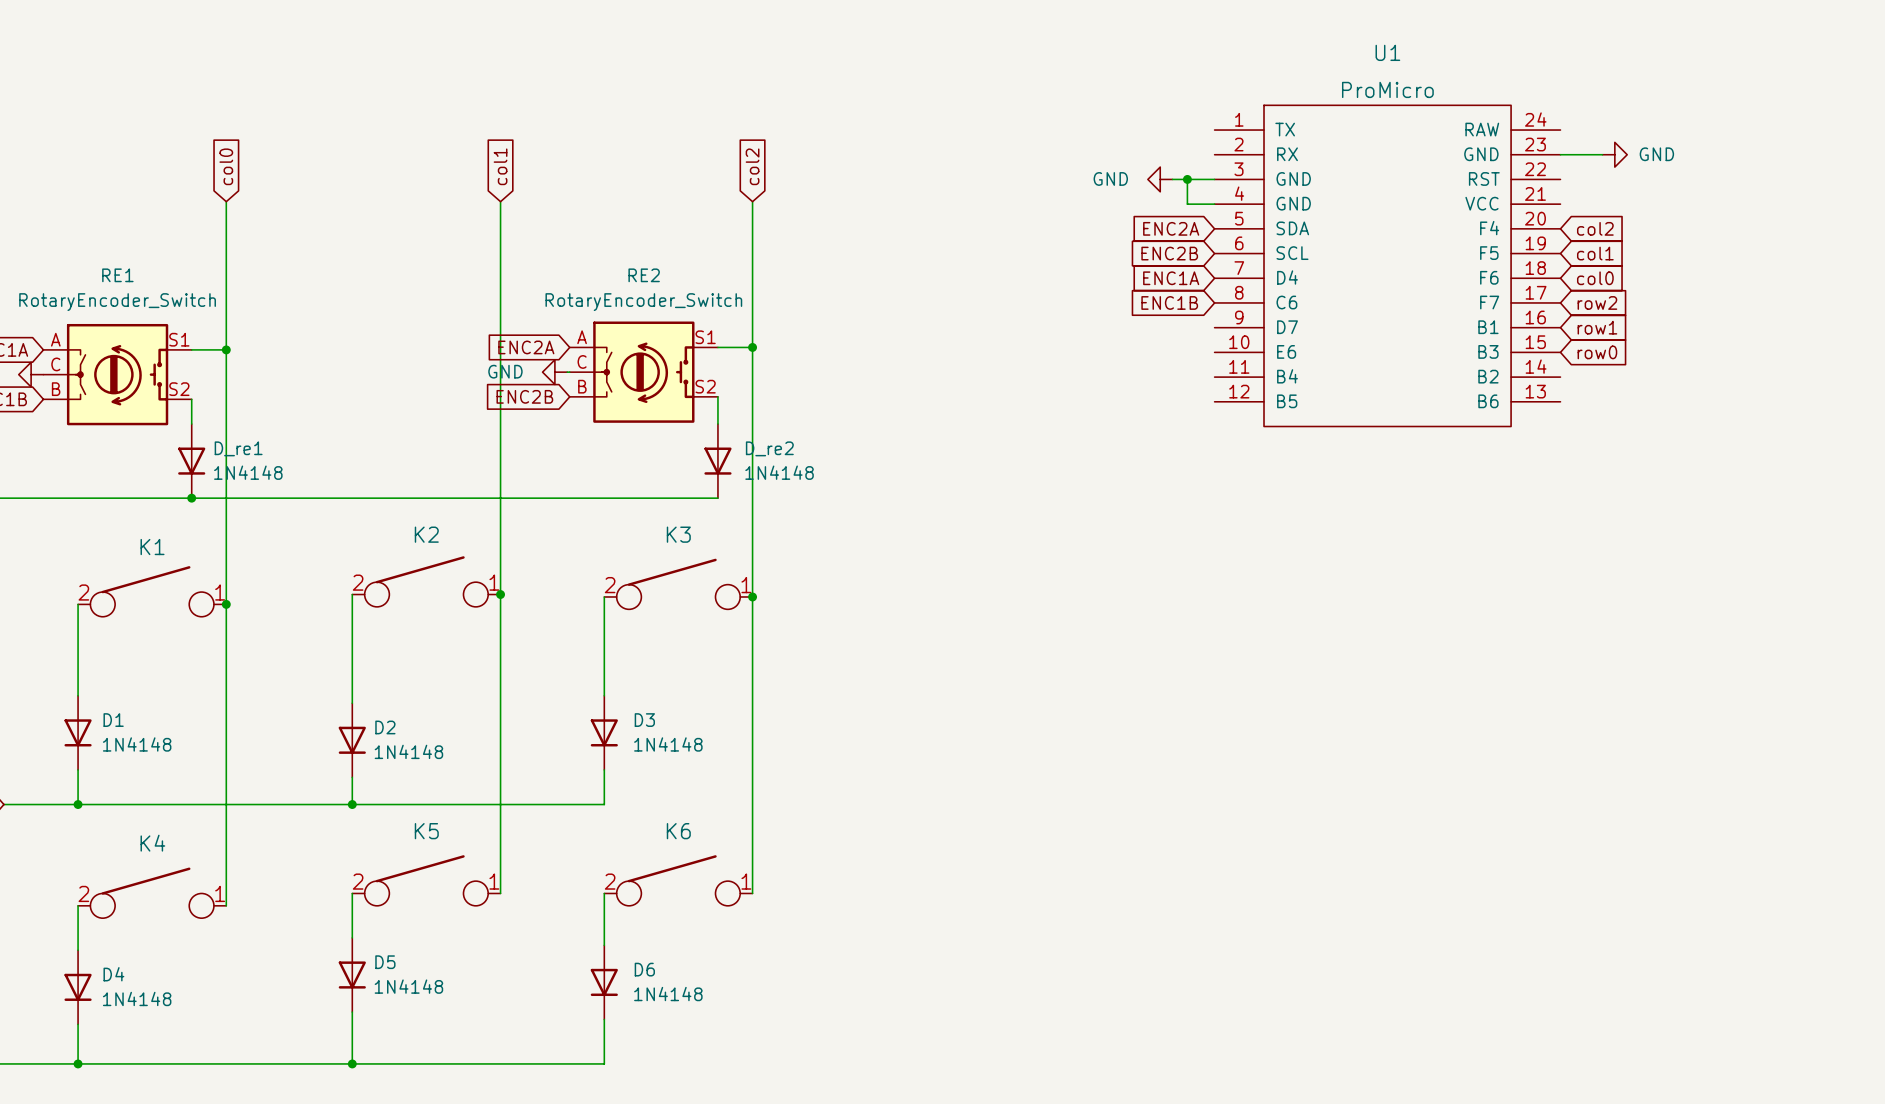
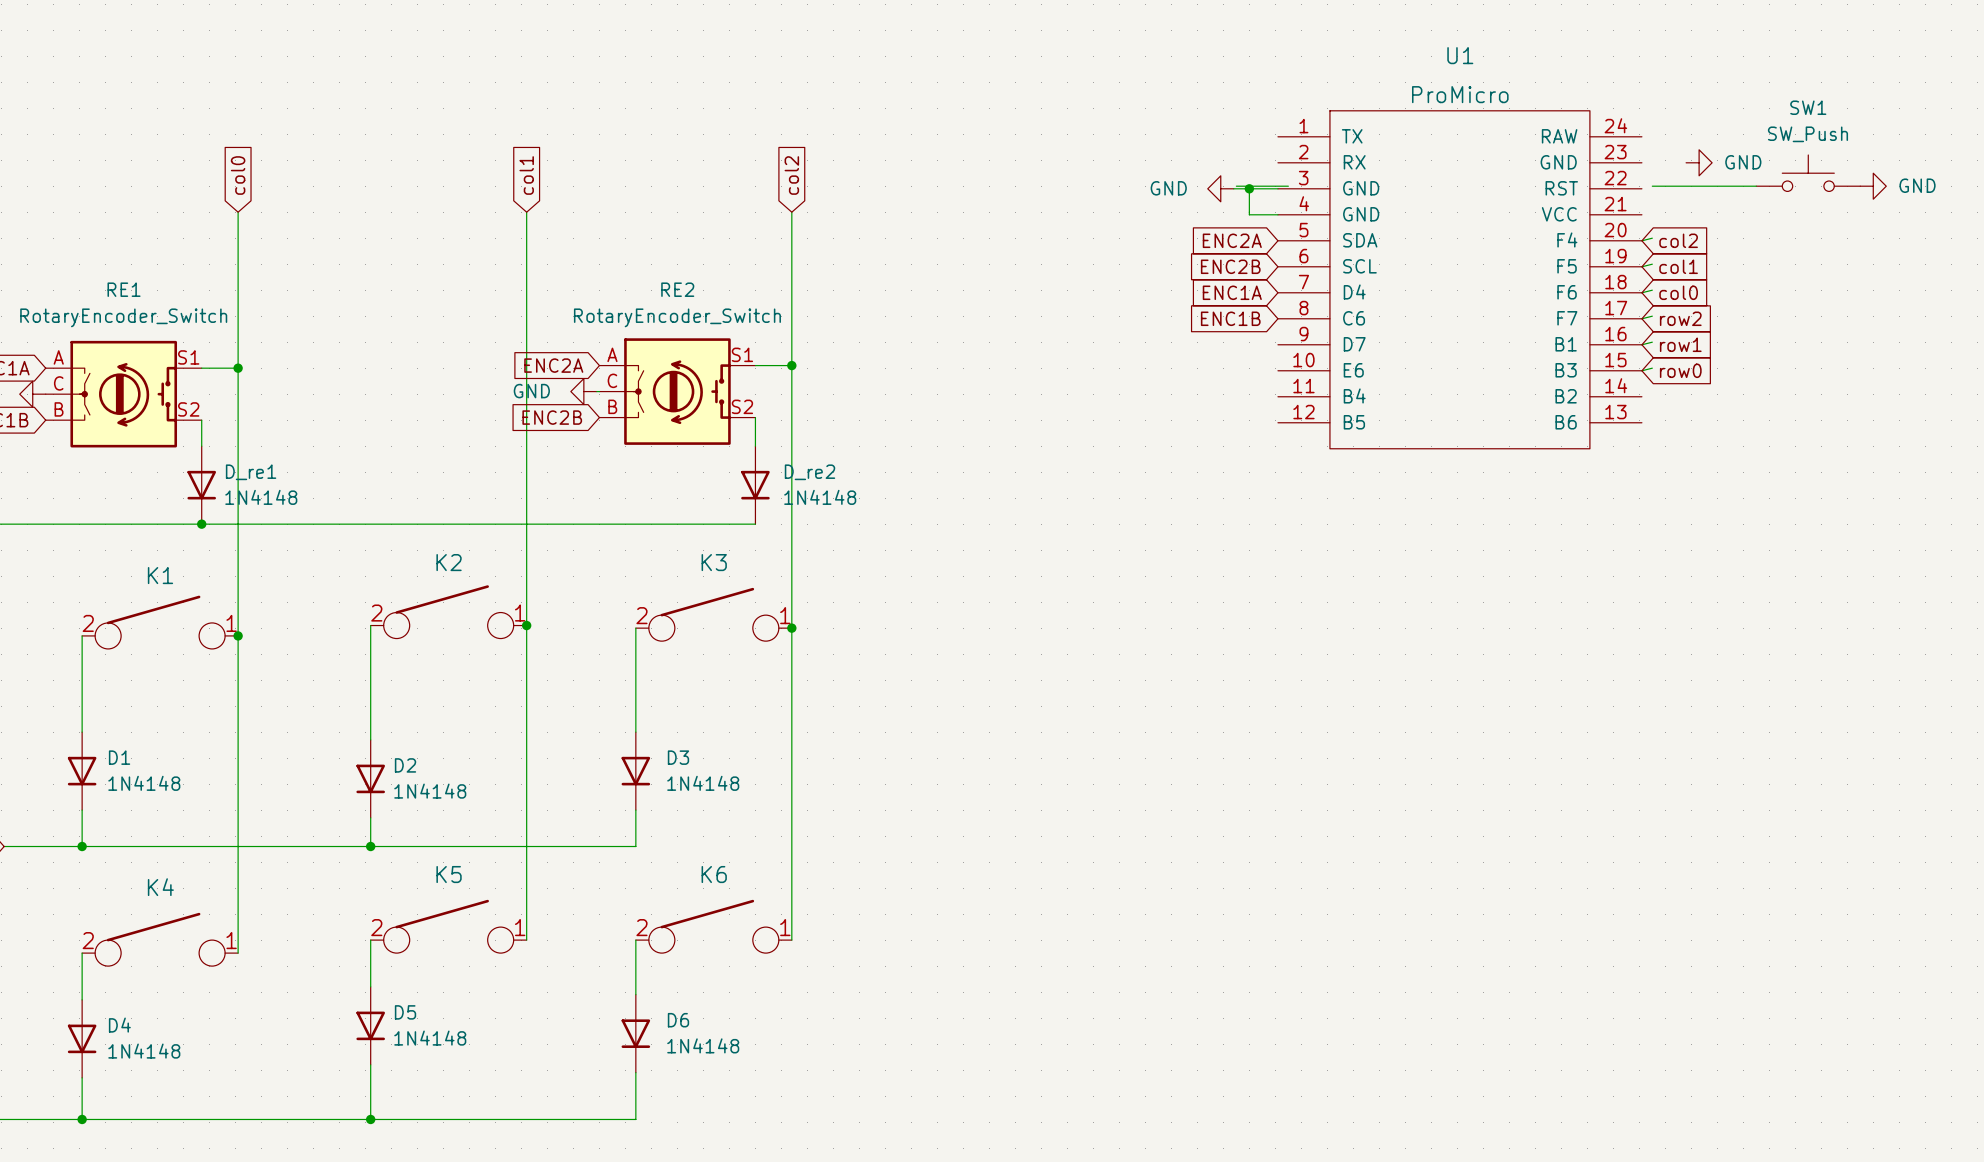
wire: (1560, 154) (1602, 154) -> none
SW1: none -> SW_Push (1808, 173)
wire: none -> (1236, 186) (1288, 186)
wire: none -> (1652, 186) (1756, 186)
power symbol: none -> GND (1873, 186)
wire: none -> (1652, 238) (1641, 240)
wire: none -> (1652, 264) (1641, 266)
wire: none -> (1652, 290) (1641, 292)
wire: none -> (1652, 316) (1641, 318)
wire: none -> (1652, 342) (1641, 344)
wire: none -> (1652, 368) (1641, 370)

